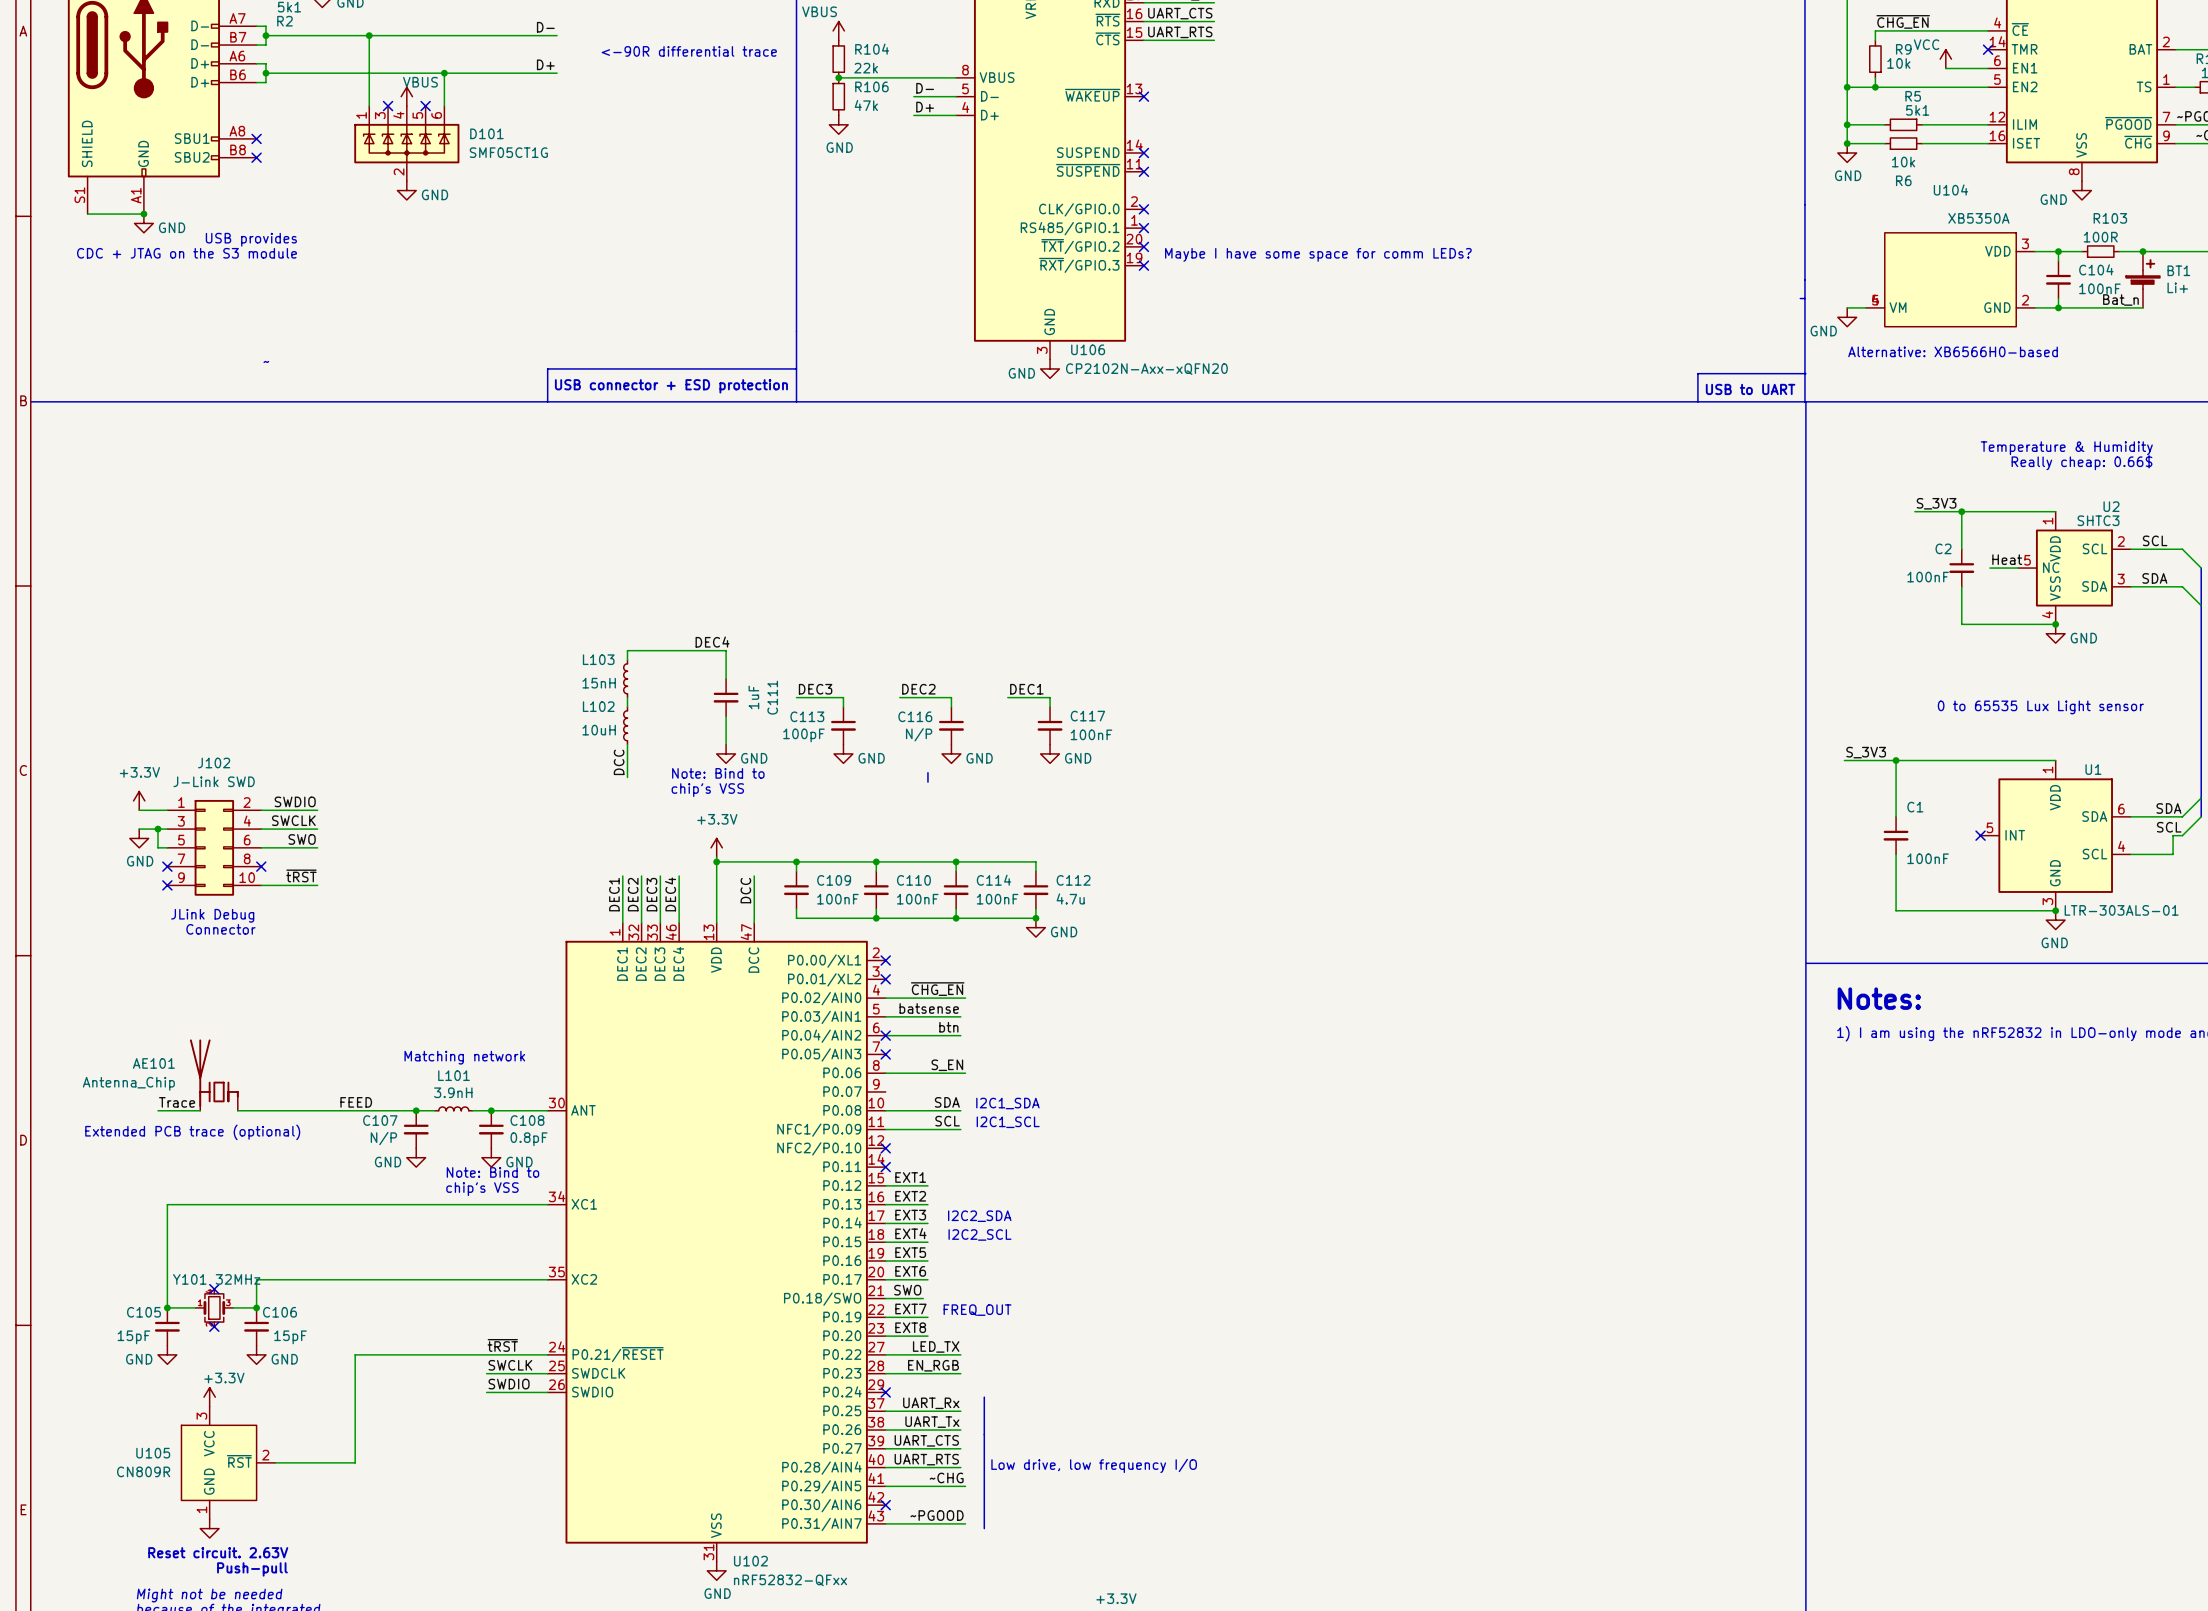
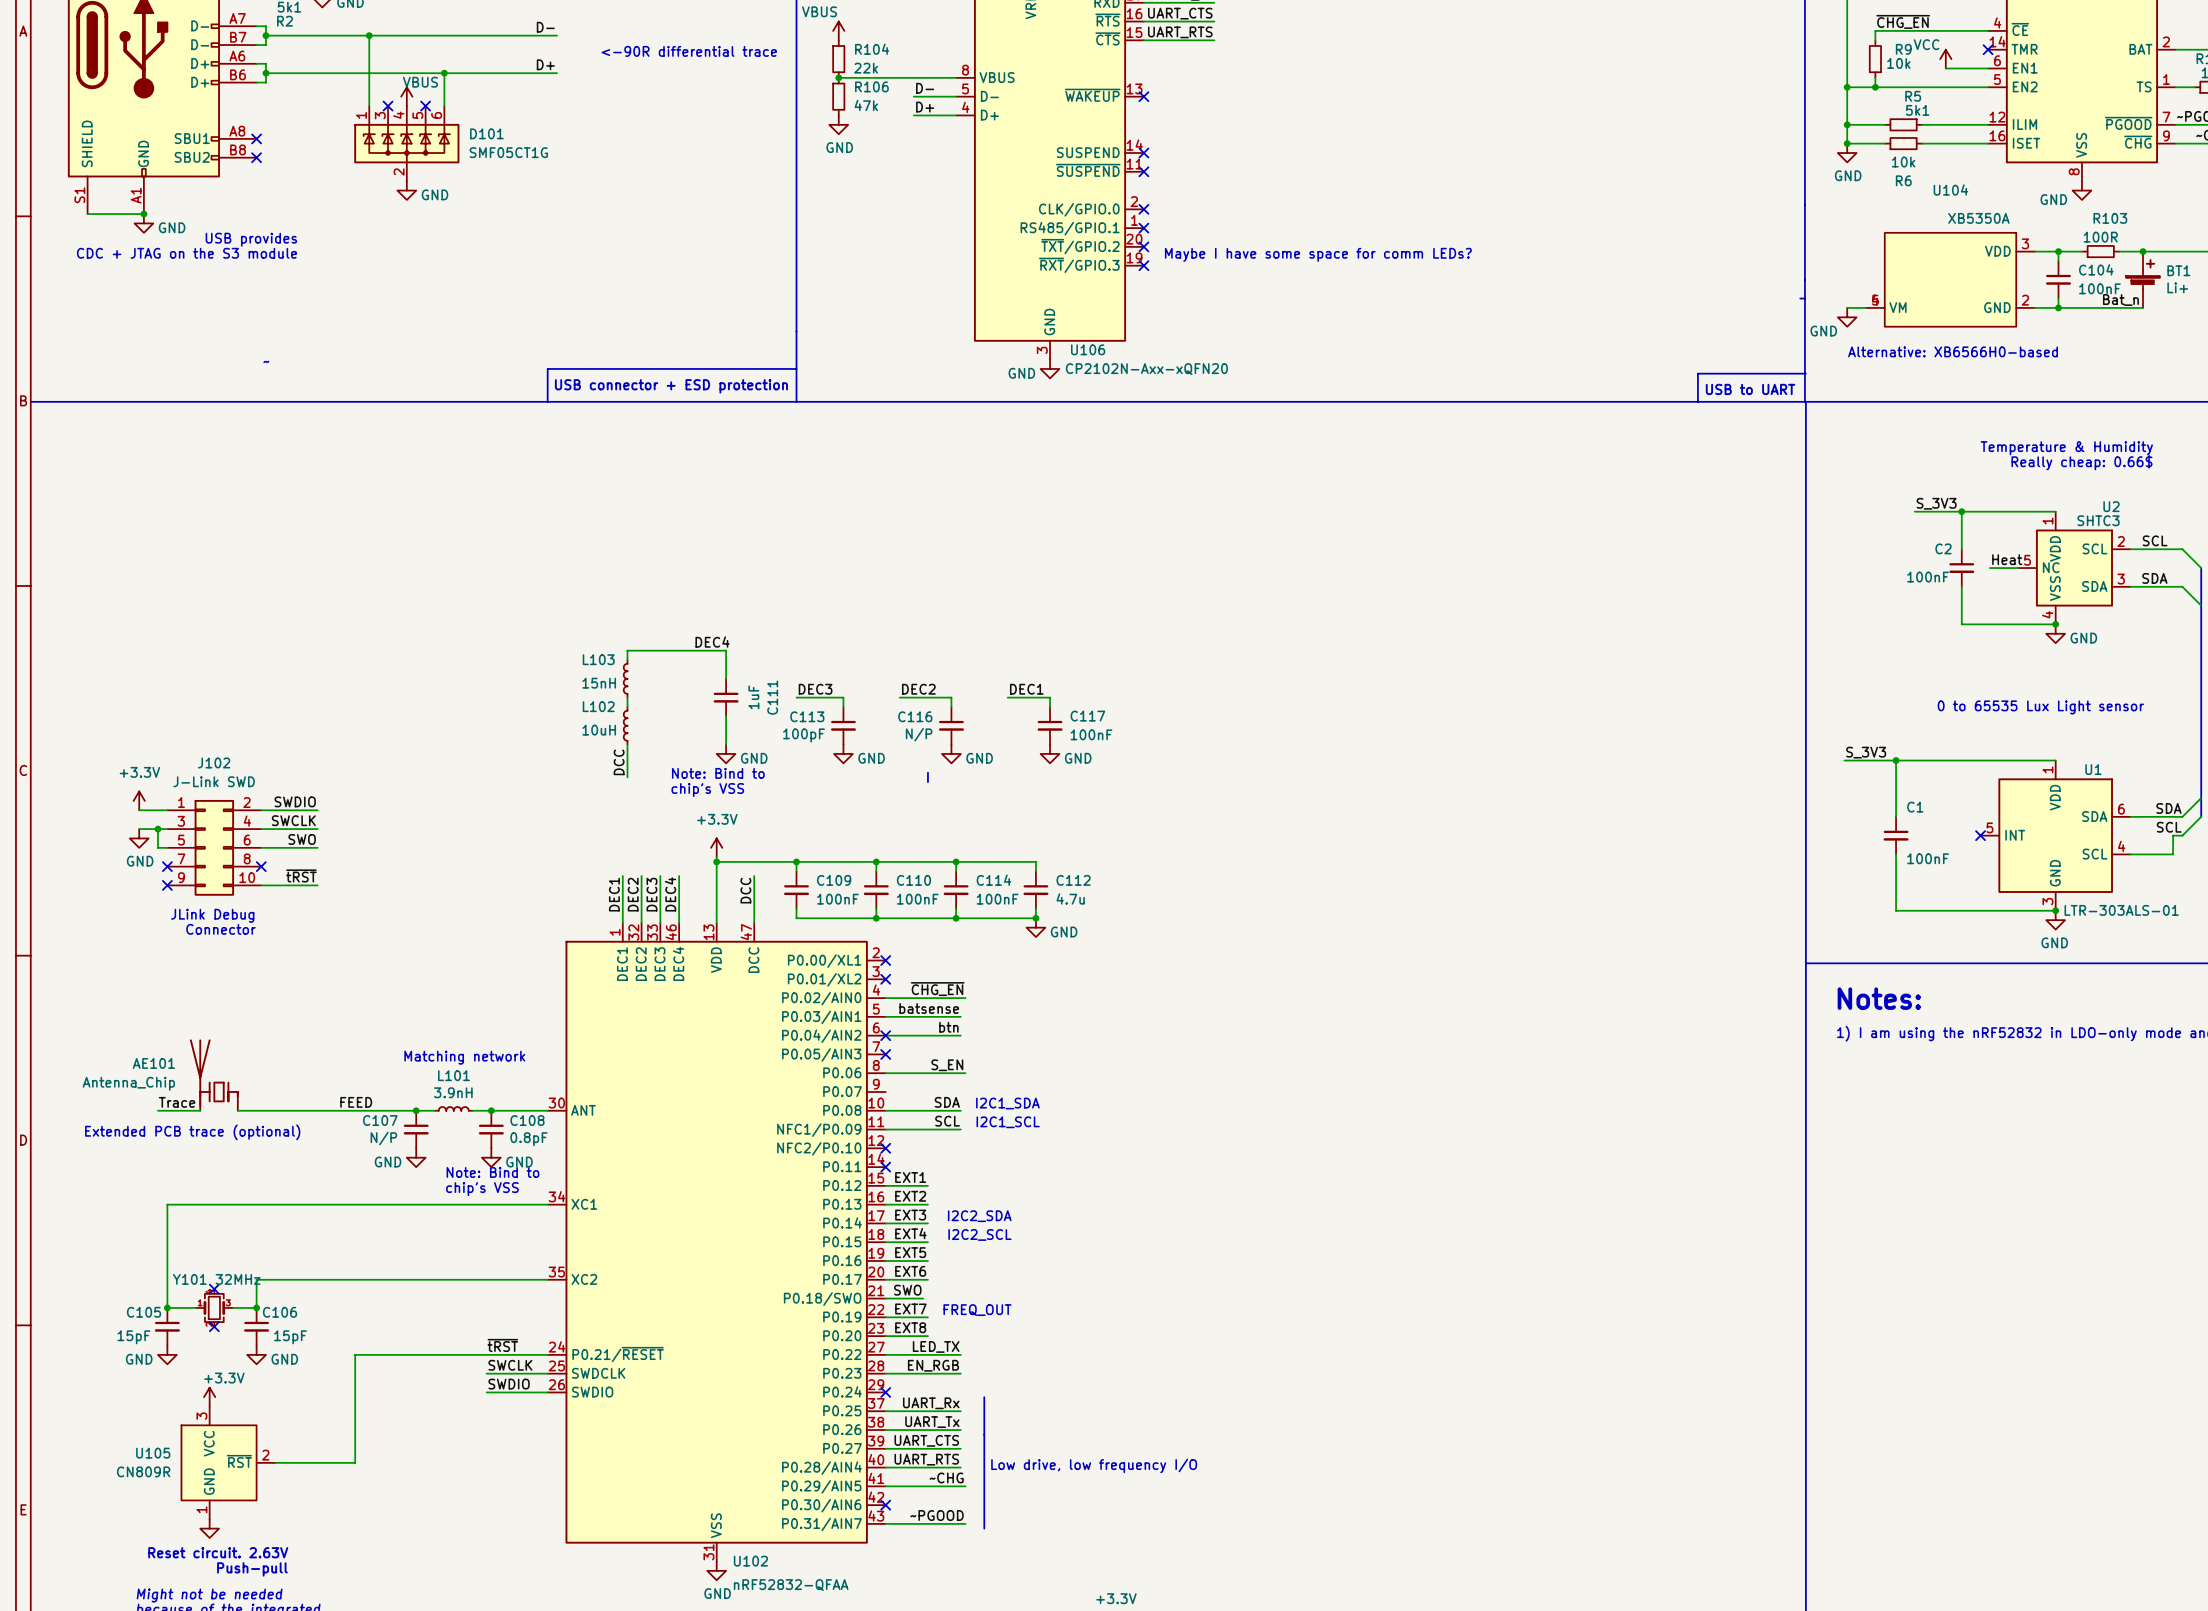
U102 value: nRF52832-QFxx (790, 1580) -> nRF52832-QFAA (791, 1585)

